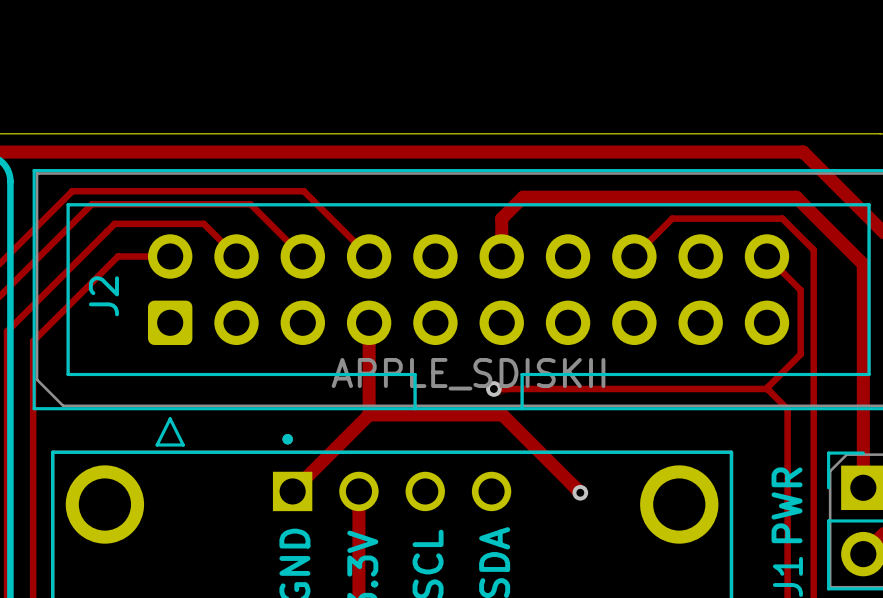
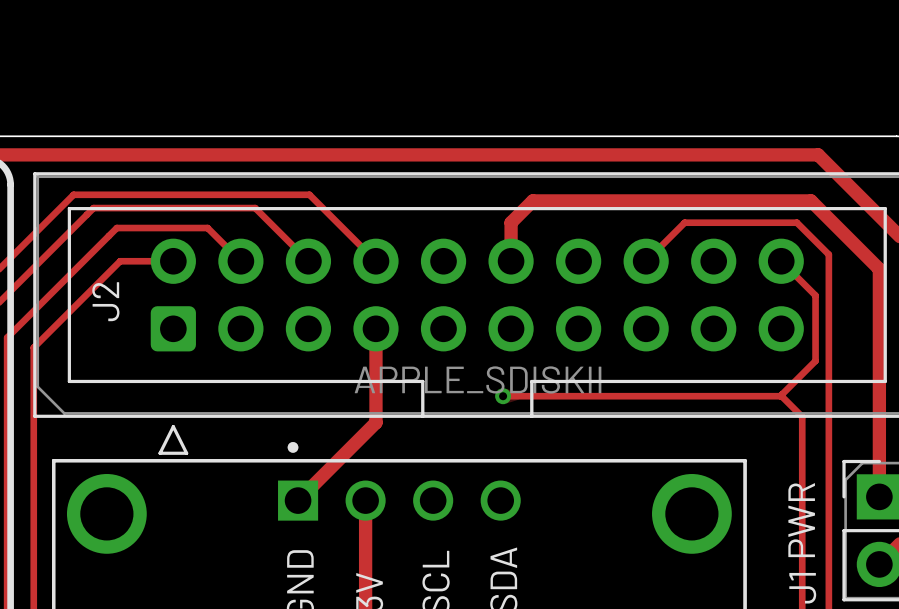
track: (369, 414) (502, 414) (580, 492) -> none
via: (580, 492) -> none

